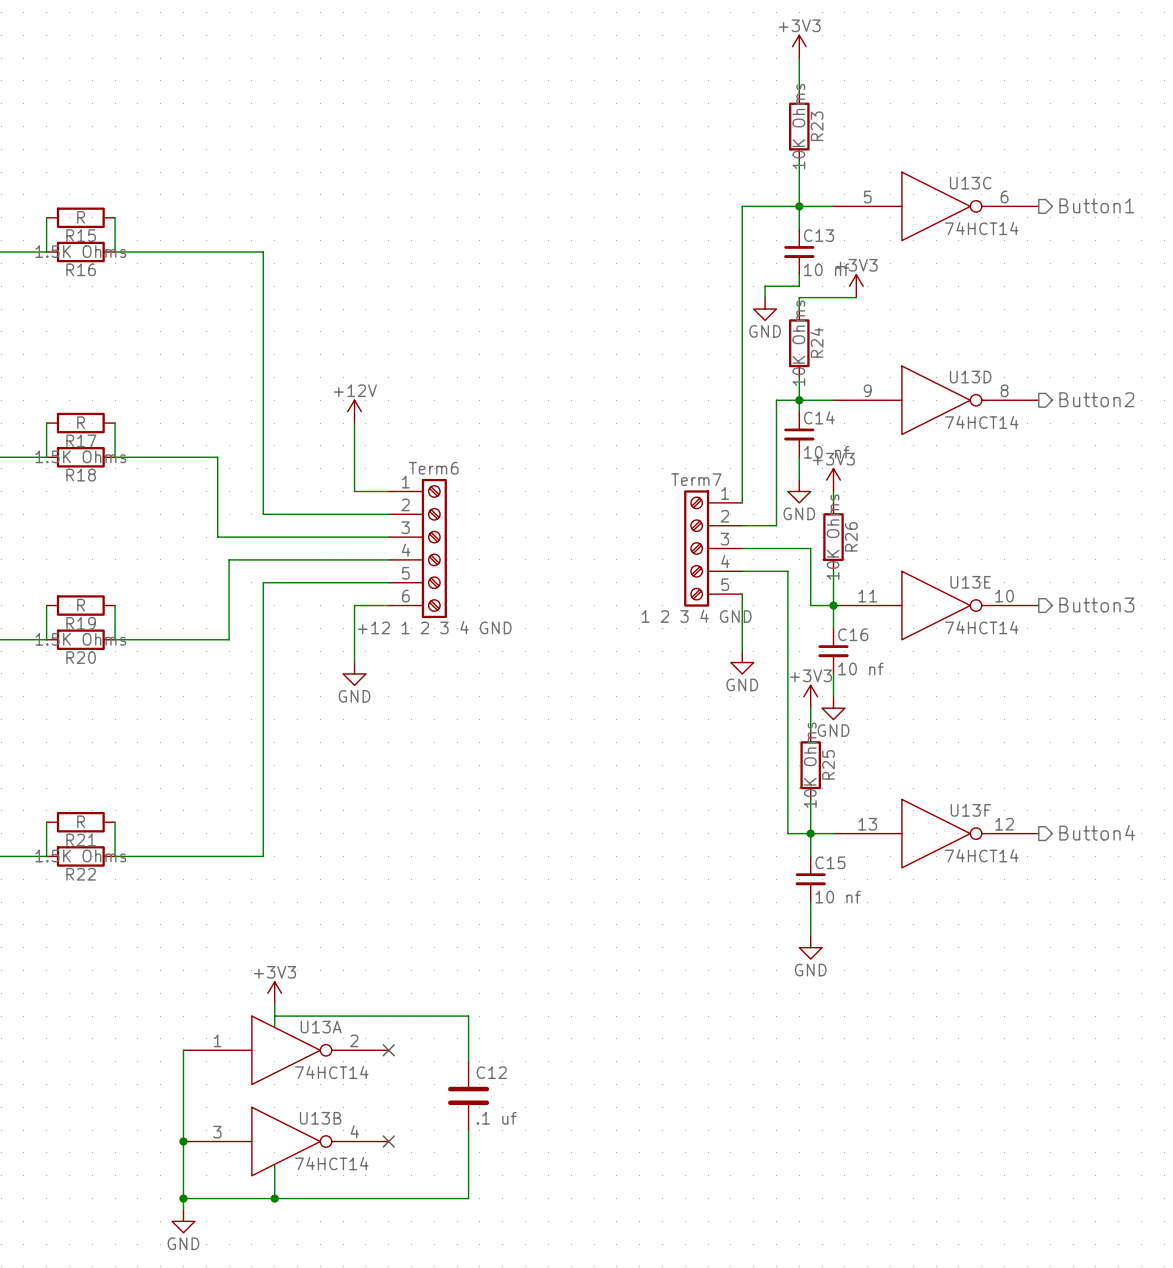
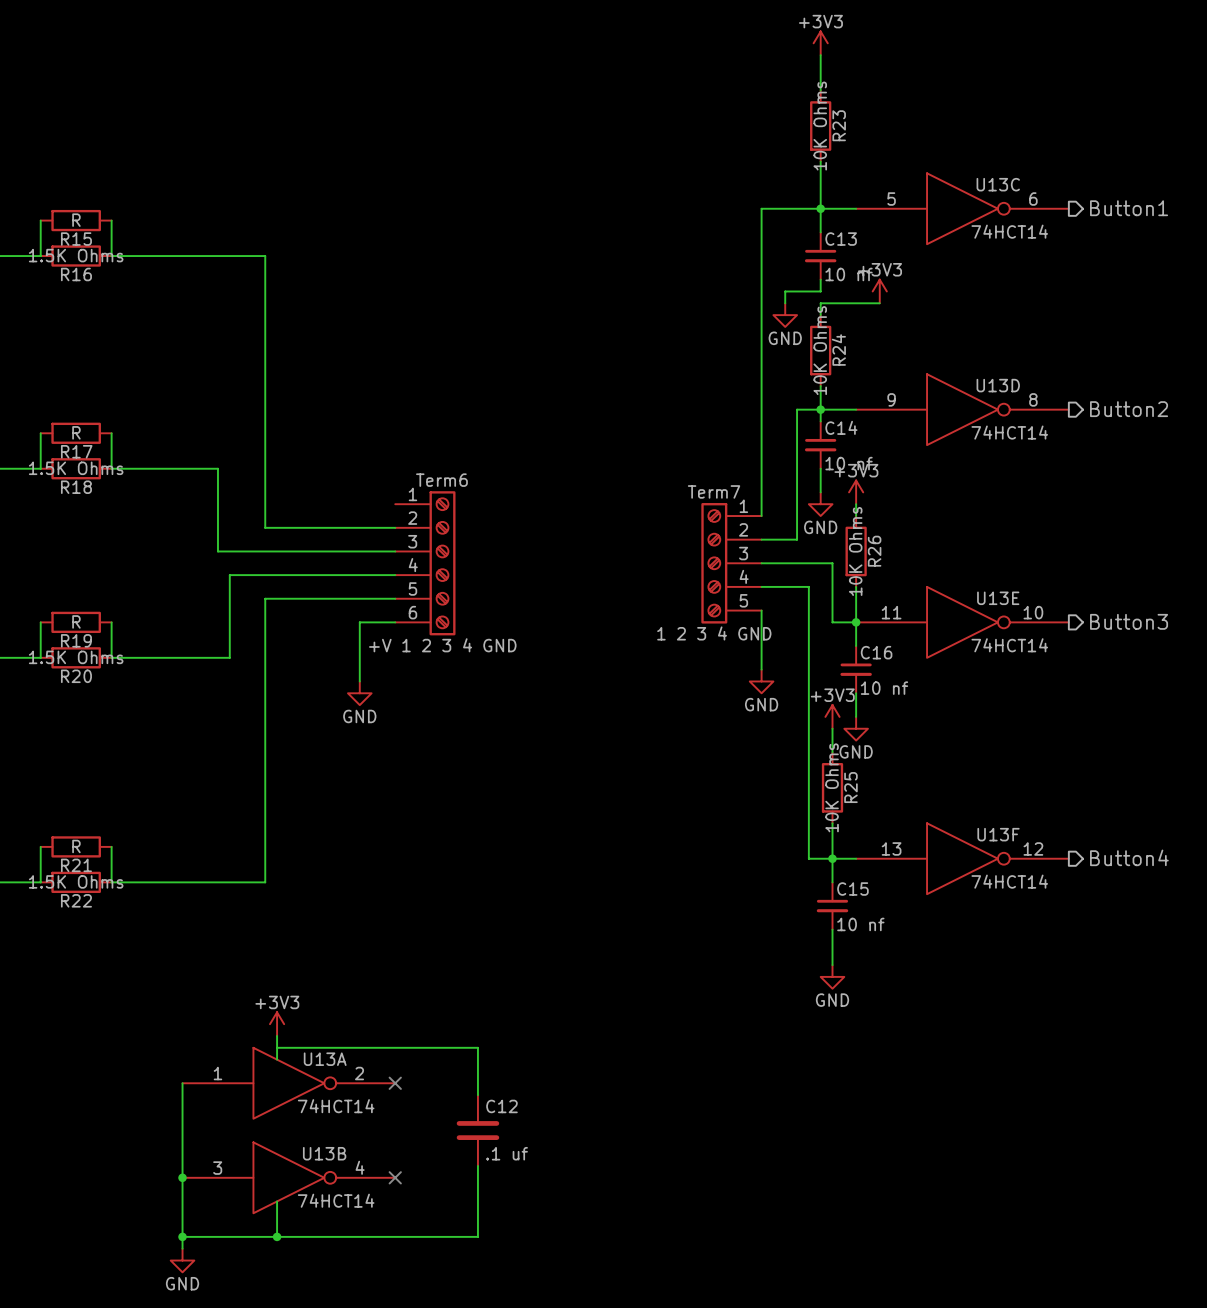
power symbol: +12V (354, 411) -> none
wire: (354, 423) (354, 491) (388, 491) -> none
Term6 value: +12 1 2 3 4 GND (434, 627) -> +V 1 2 3 4 GND (442, 645)

